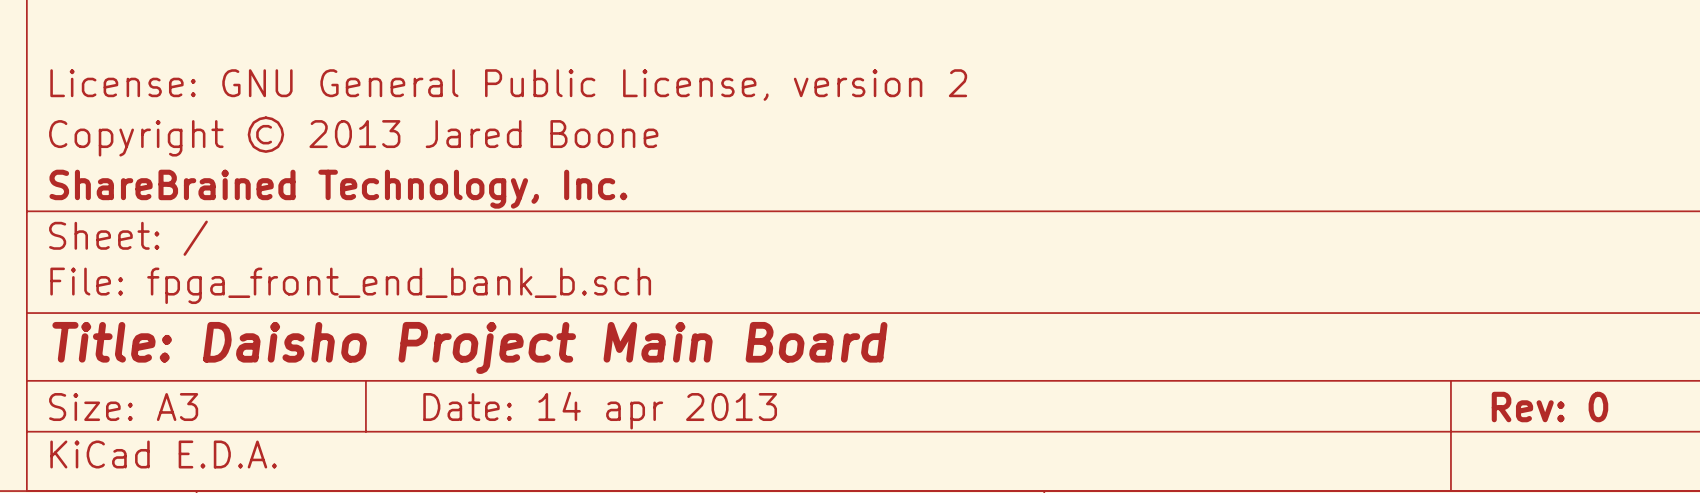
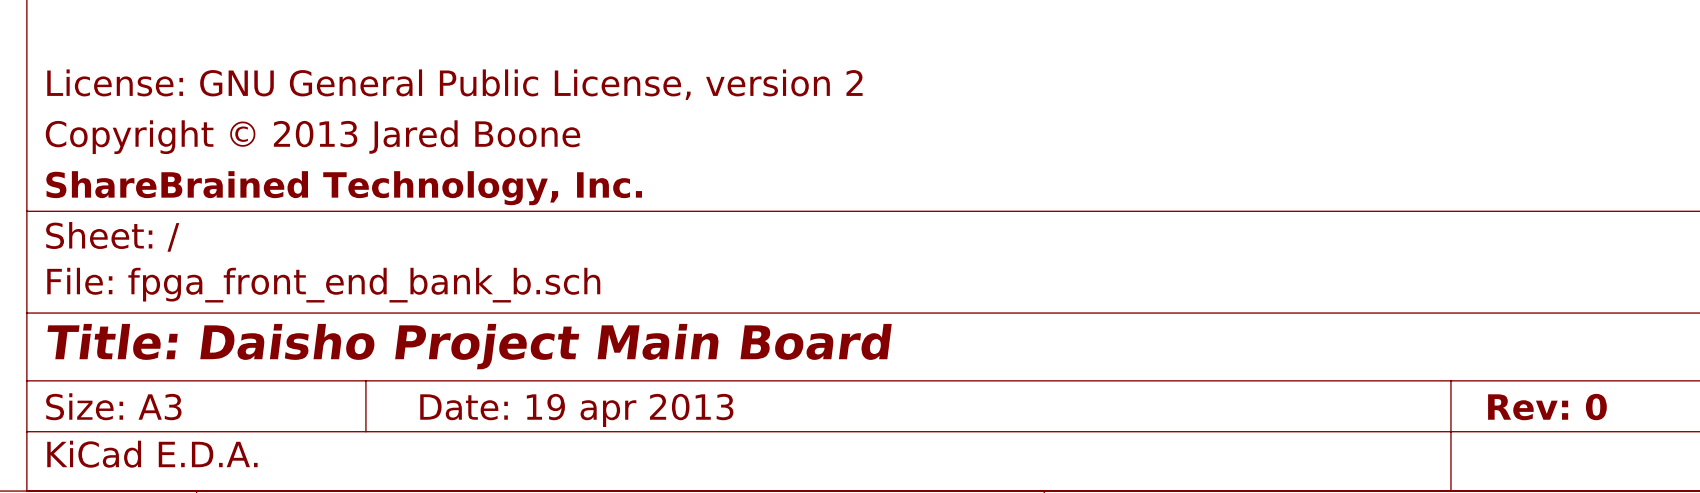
title block: Date: 14 apr 2013 (600, 410) -> Date: 19 apr 2013 (576, 410)

